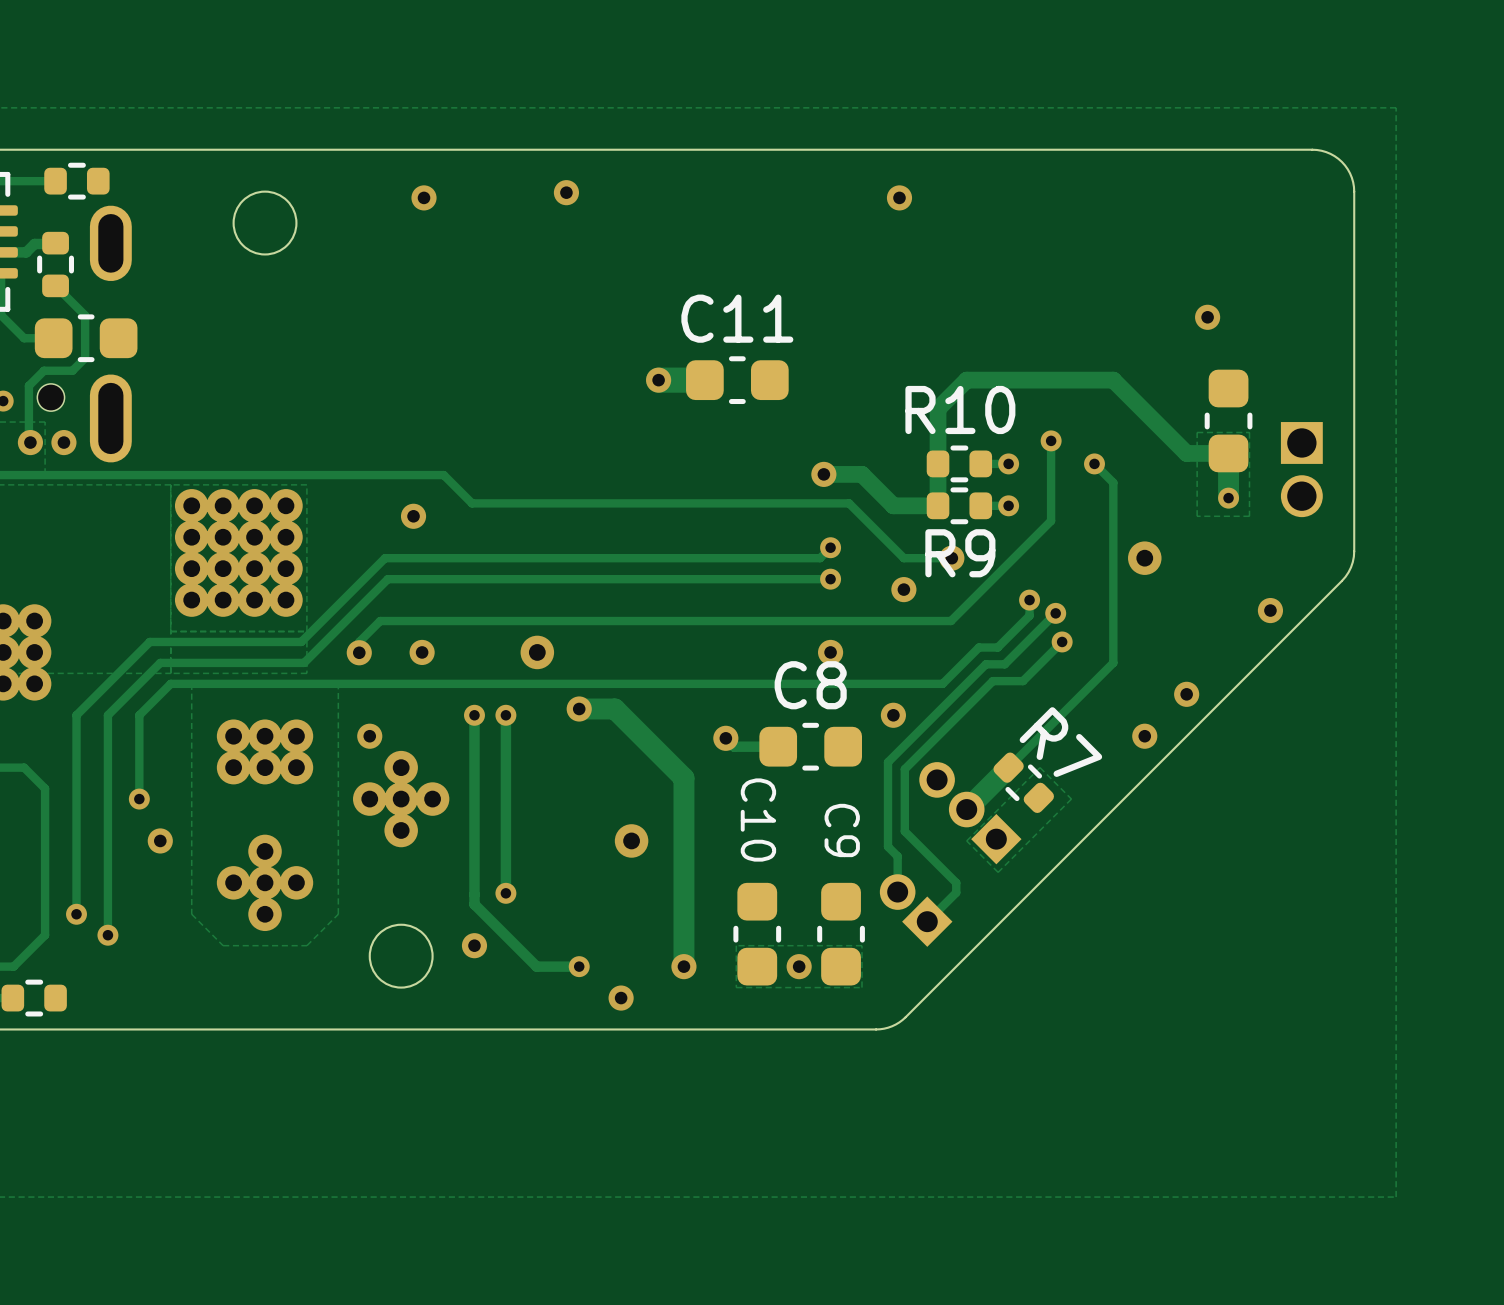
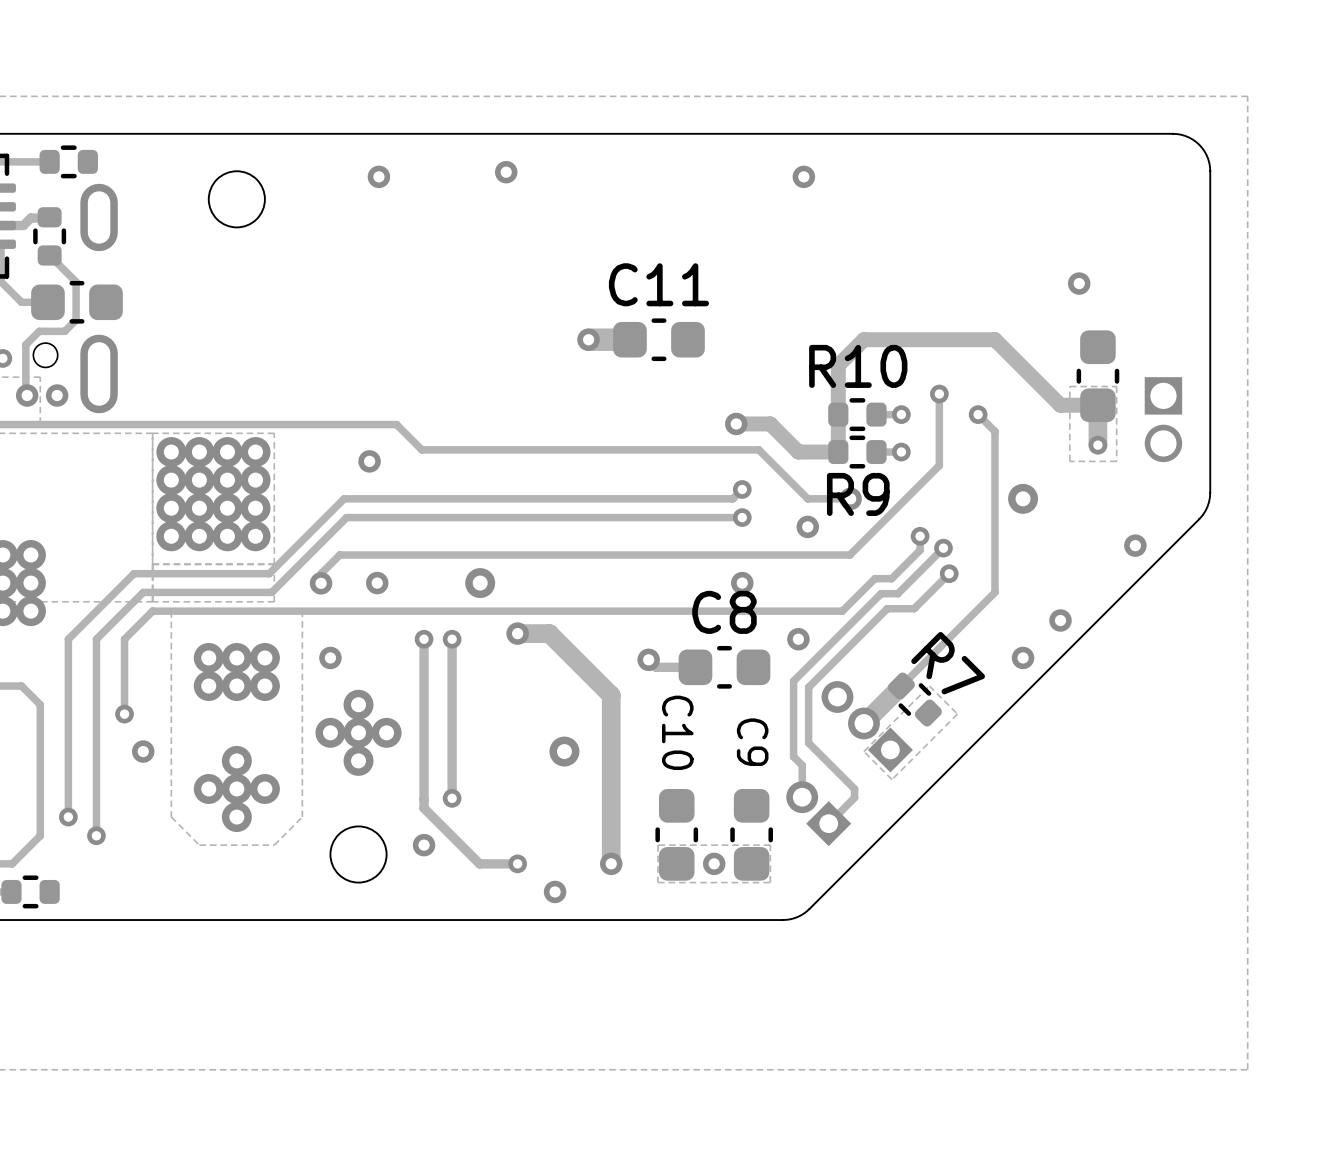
via: (401, 767) -> none
via: none -> (358, 704)
via: (369, 799) -> none
via: (401, 799) -> none
via: (432, 799) -> none
via: none -> (330, 732)
via: none -> (358, 732)
via: none -> (386, 732)
via: (401, 830) -> none
via: none -> (358, 760)

